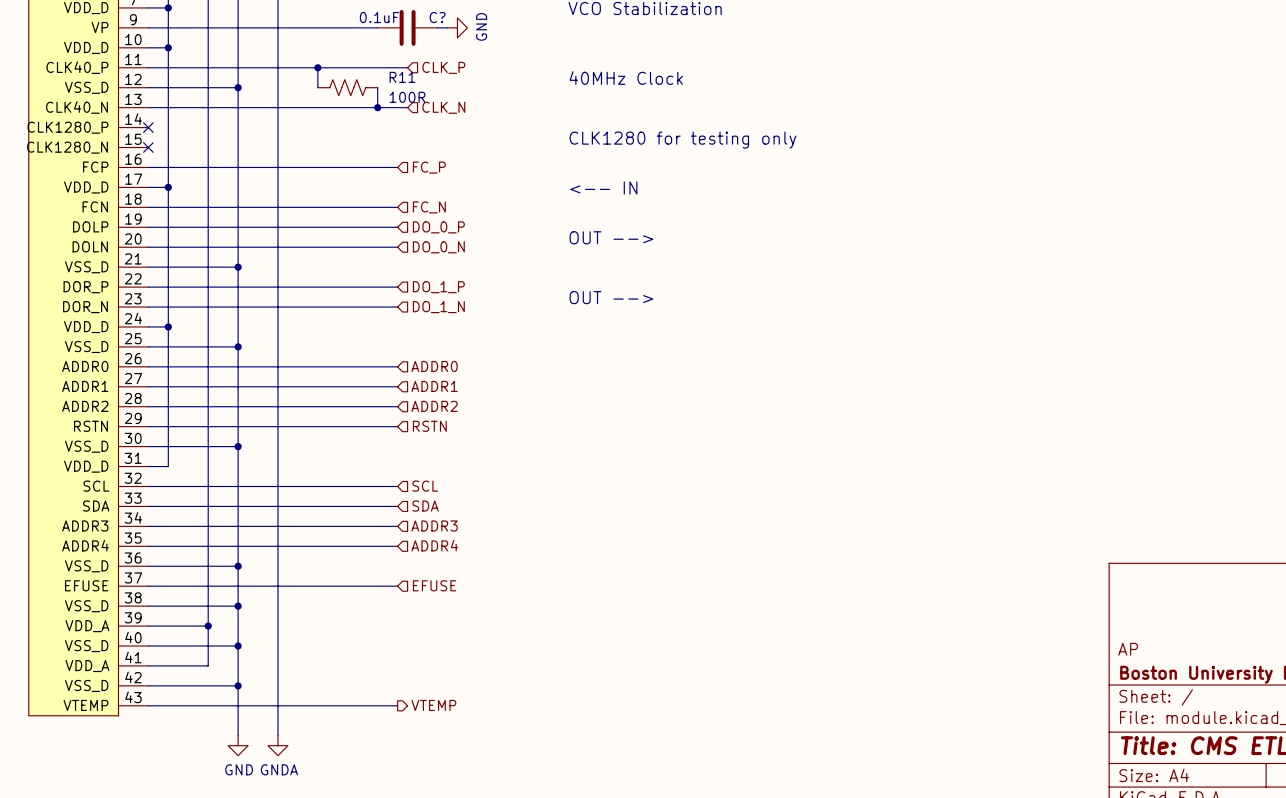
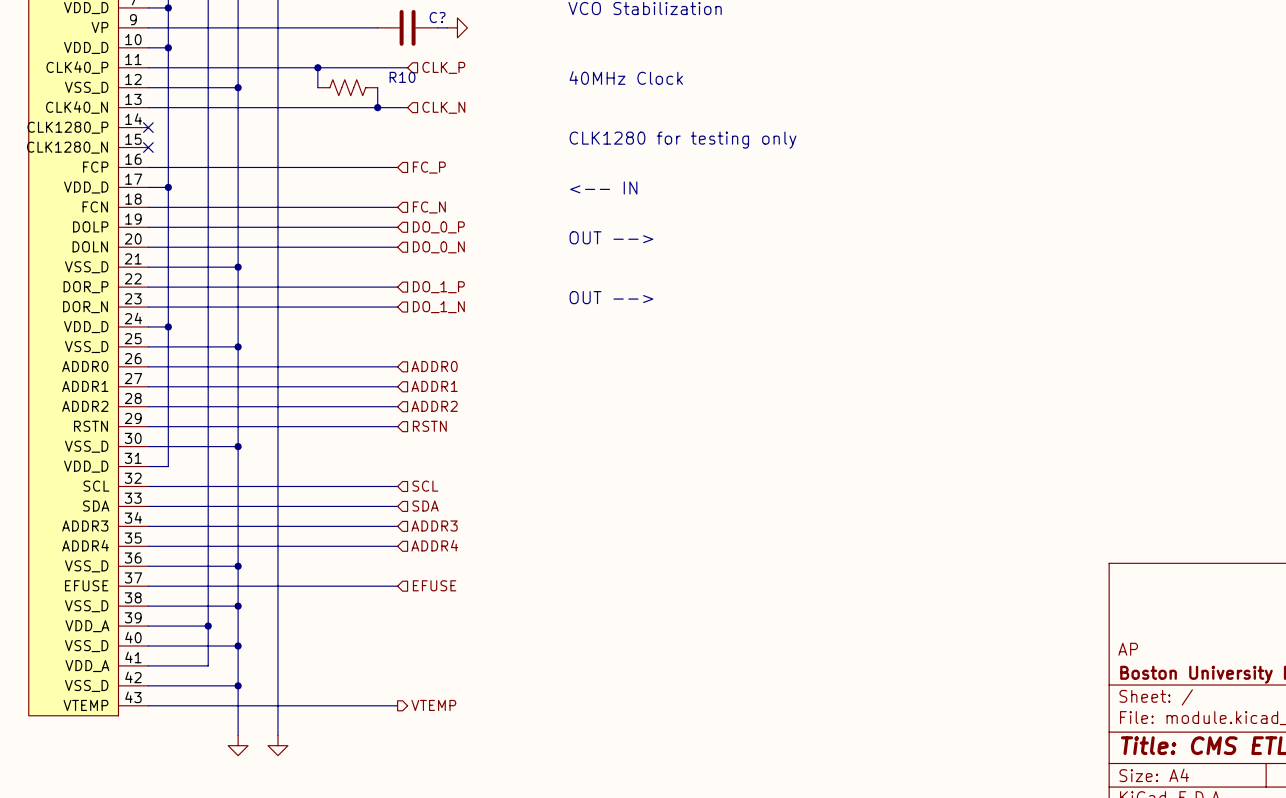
C? value: 0.1uF (379, 17) -> none
power symbol text: GND (481, 26) -> none
R11 name: R11 (402, 77) -> R10 (402, 77)
R11 value: 100R (407, 97) -> none
power symbol text: GND (239, 769) -> none
power symbol text: GNDA (279, 769) -> none

